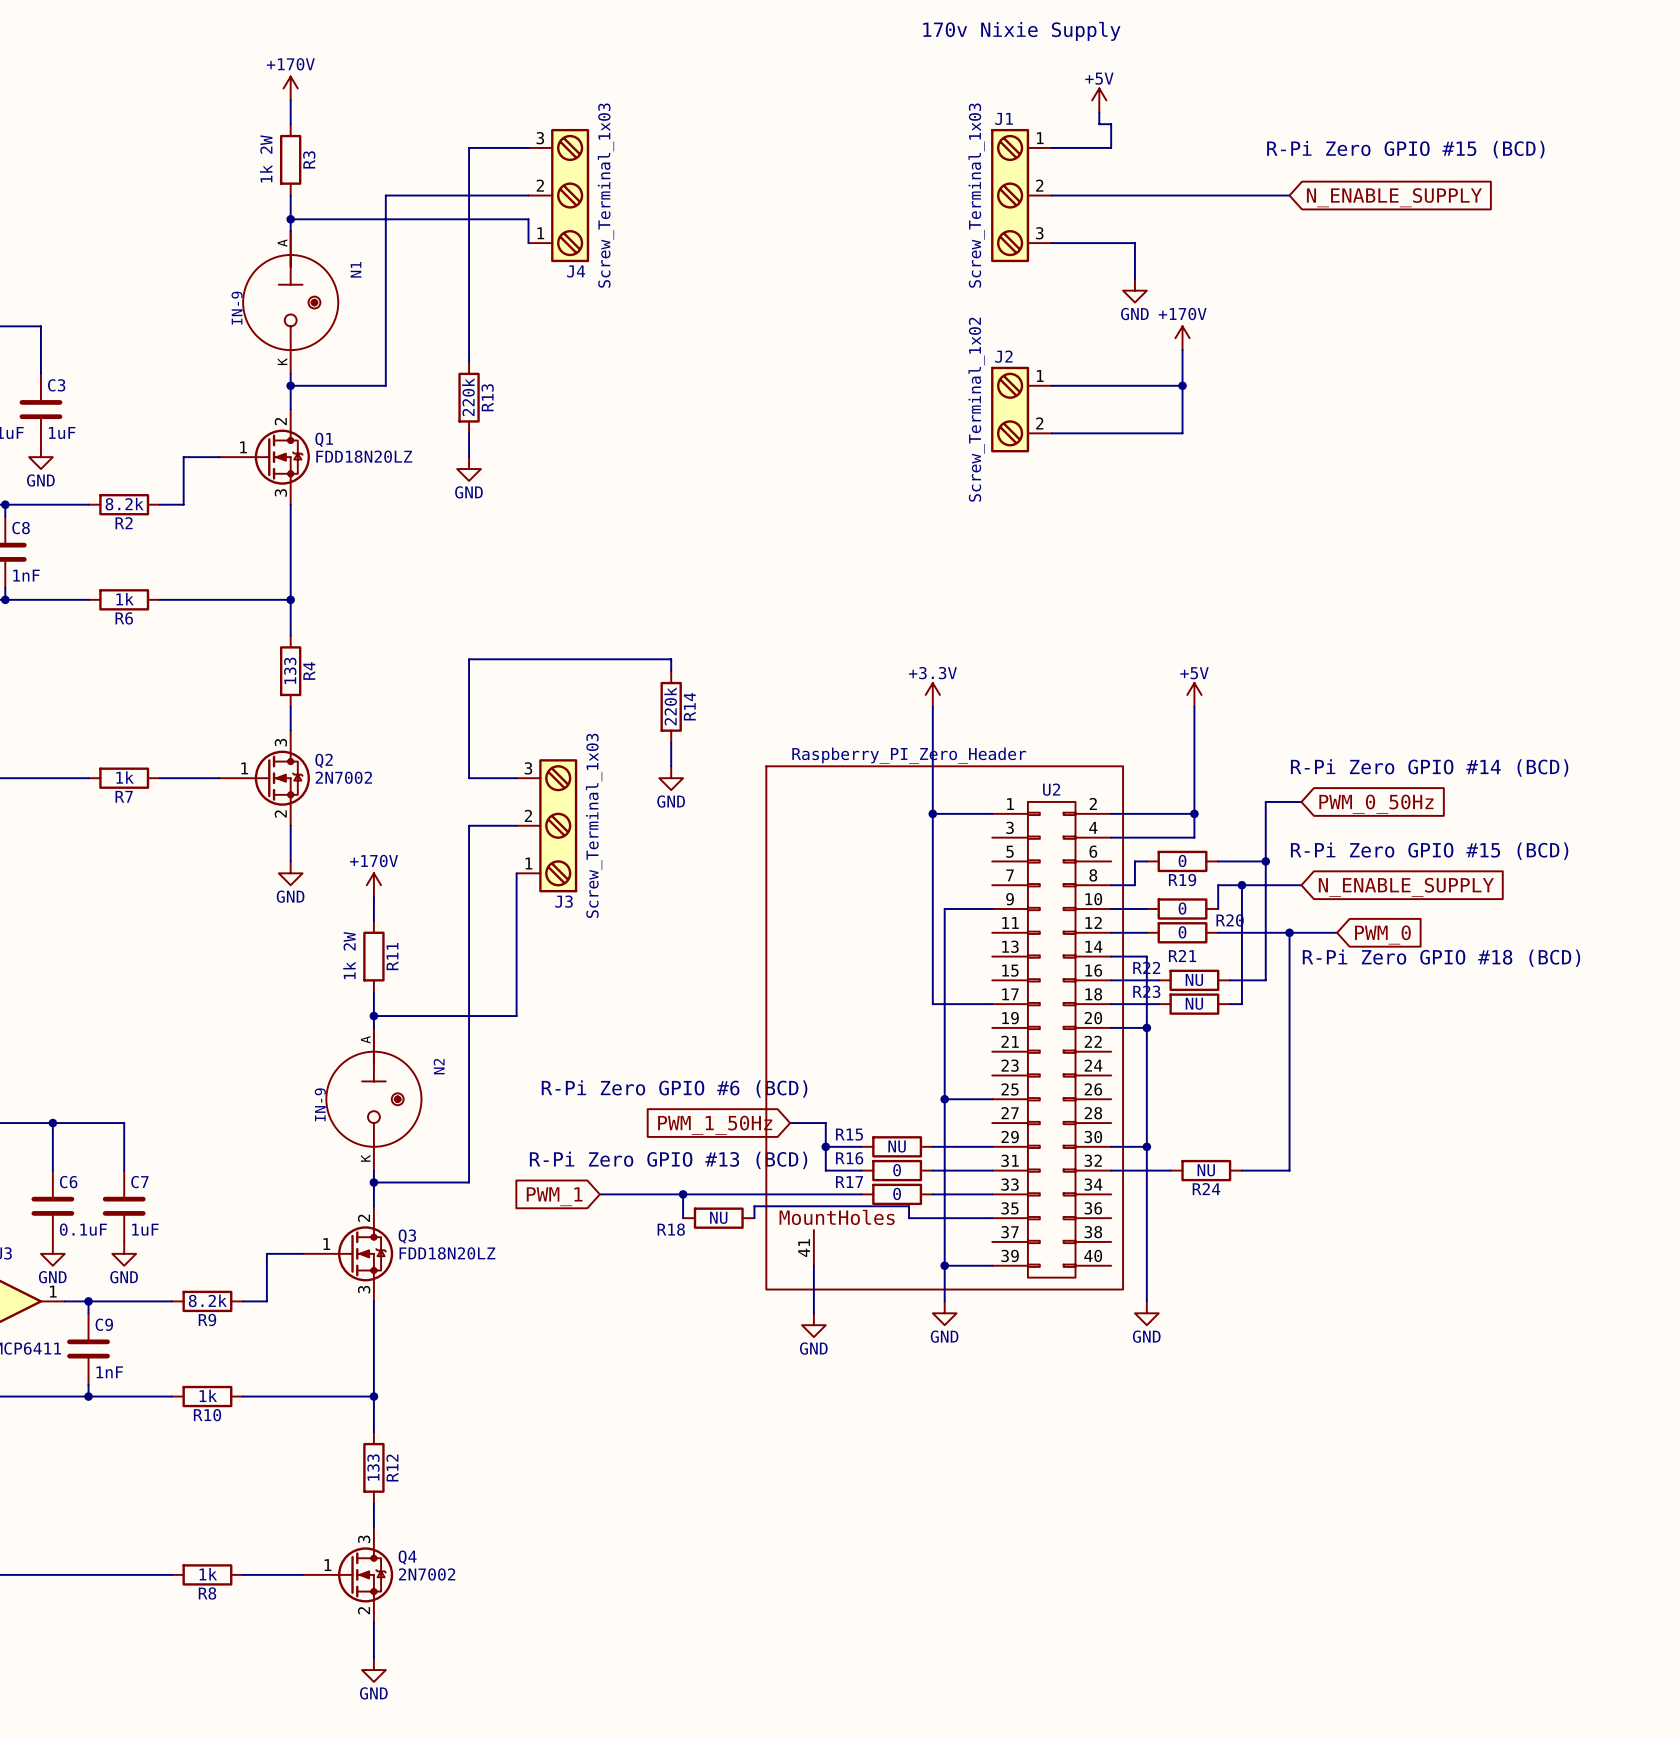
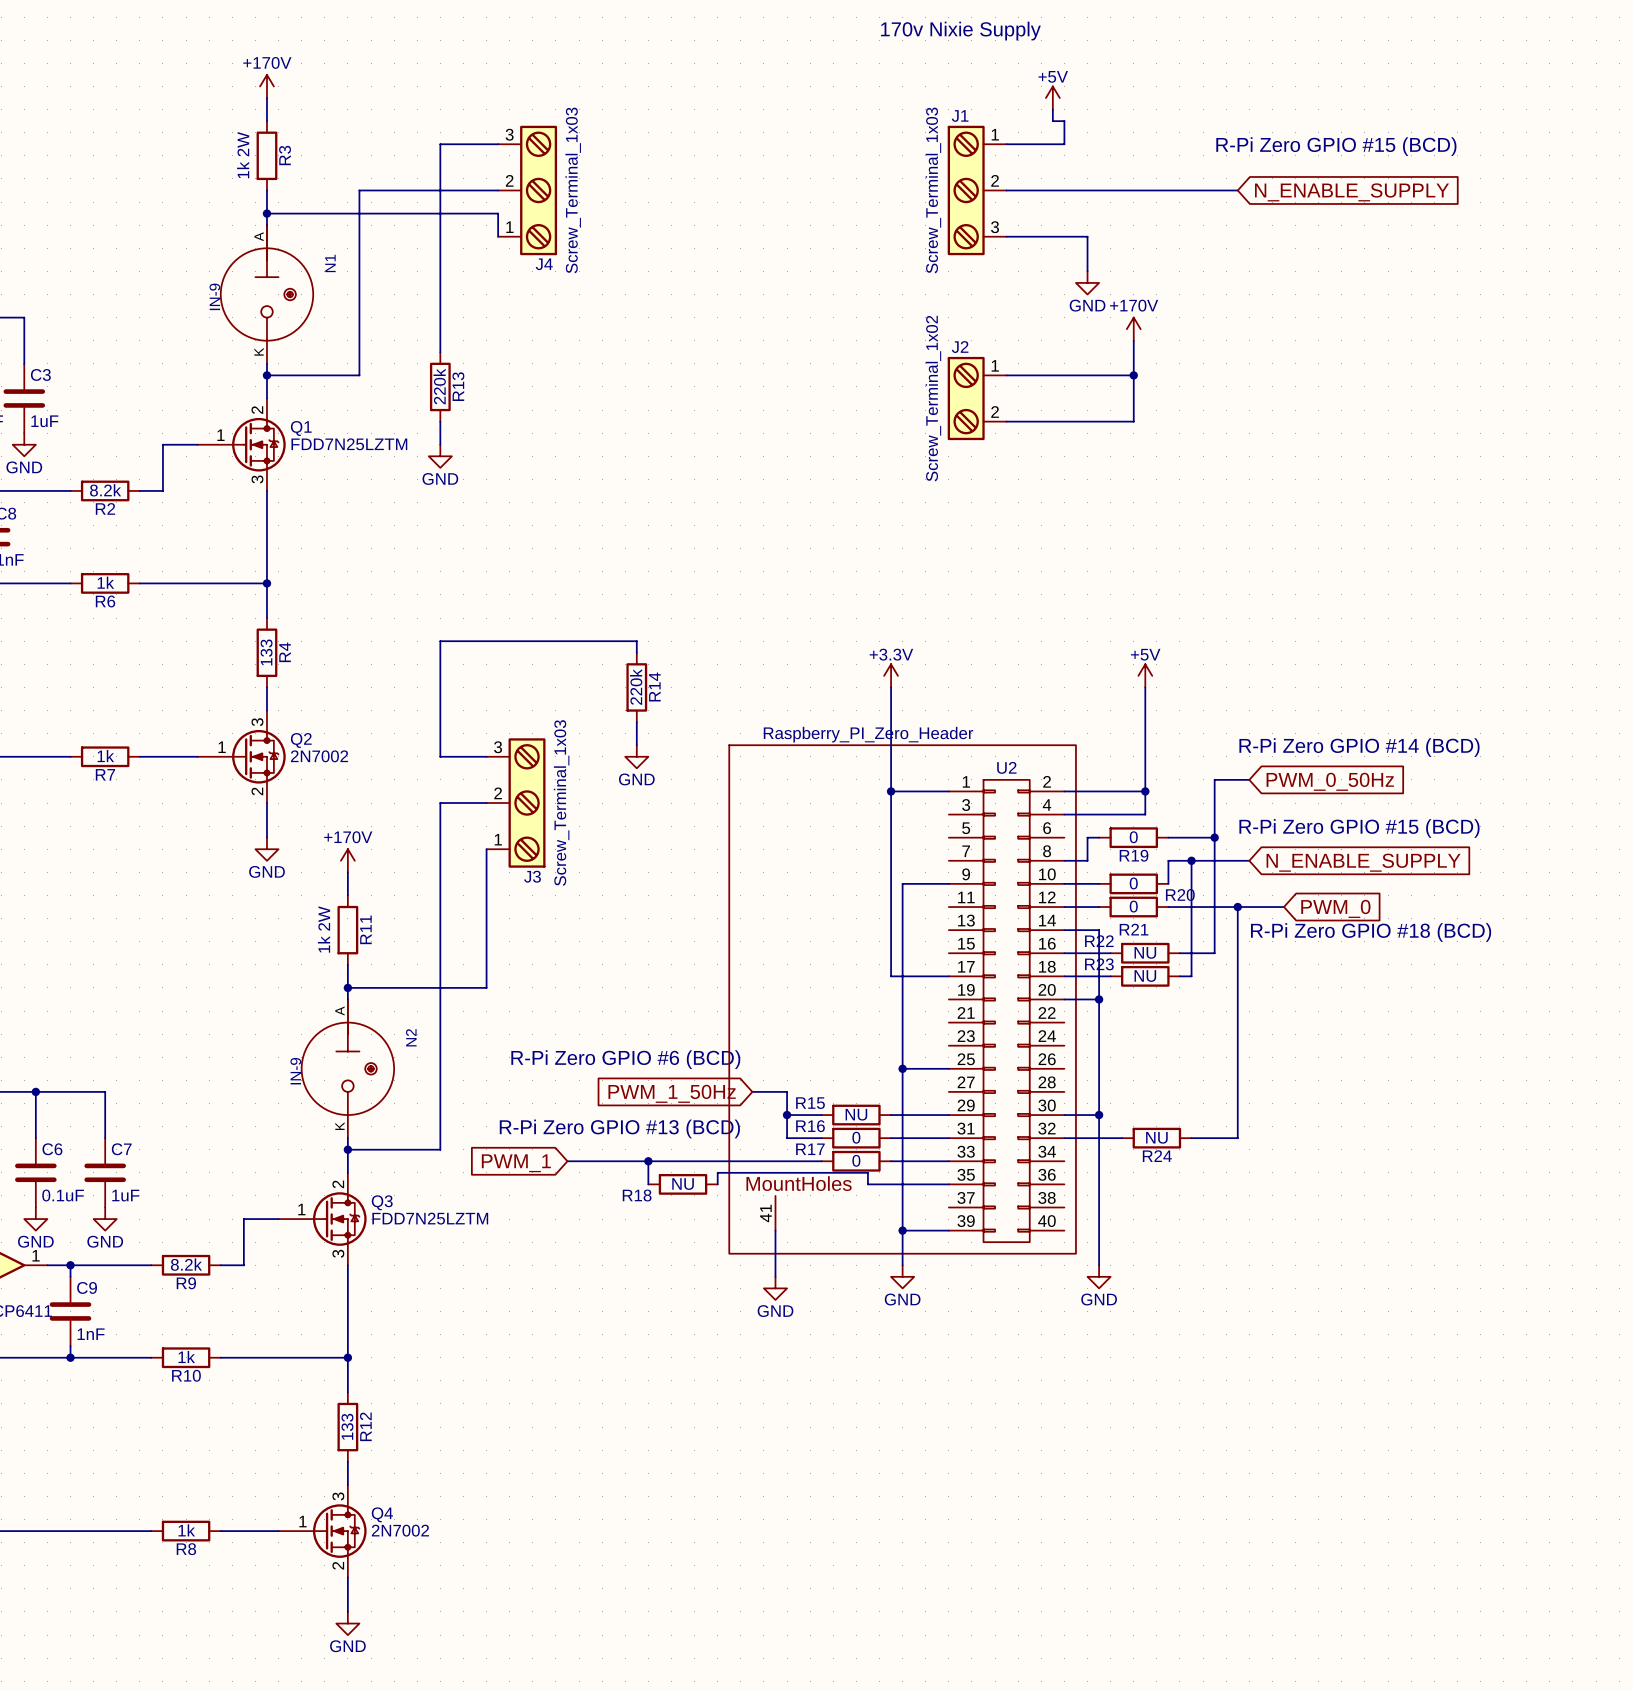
Q1 value: FDD18N20LZ (364, 456) -> FDD7N25LZTM (349, 444)
Q3 value: FDD18N20LZ (447, 1253) -> FDD7N25LZTM (430, 1218)

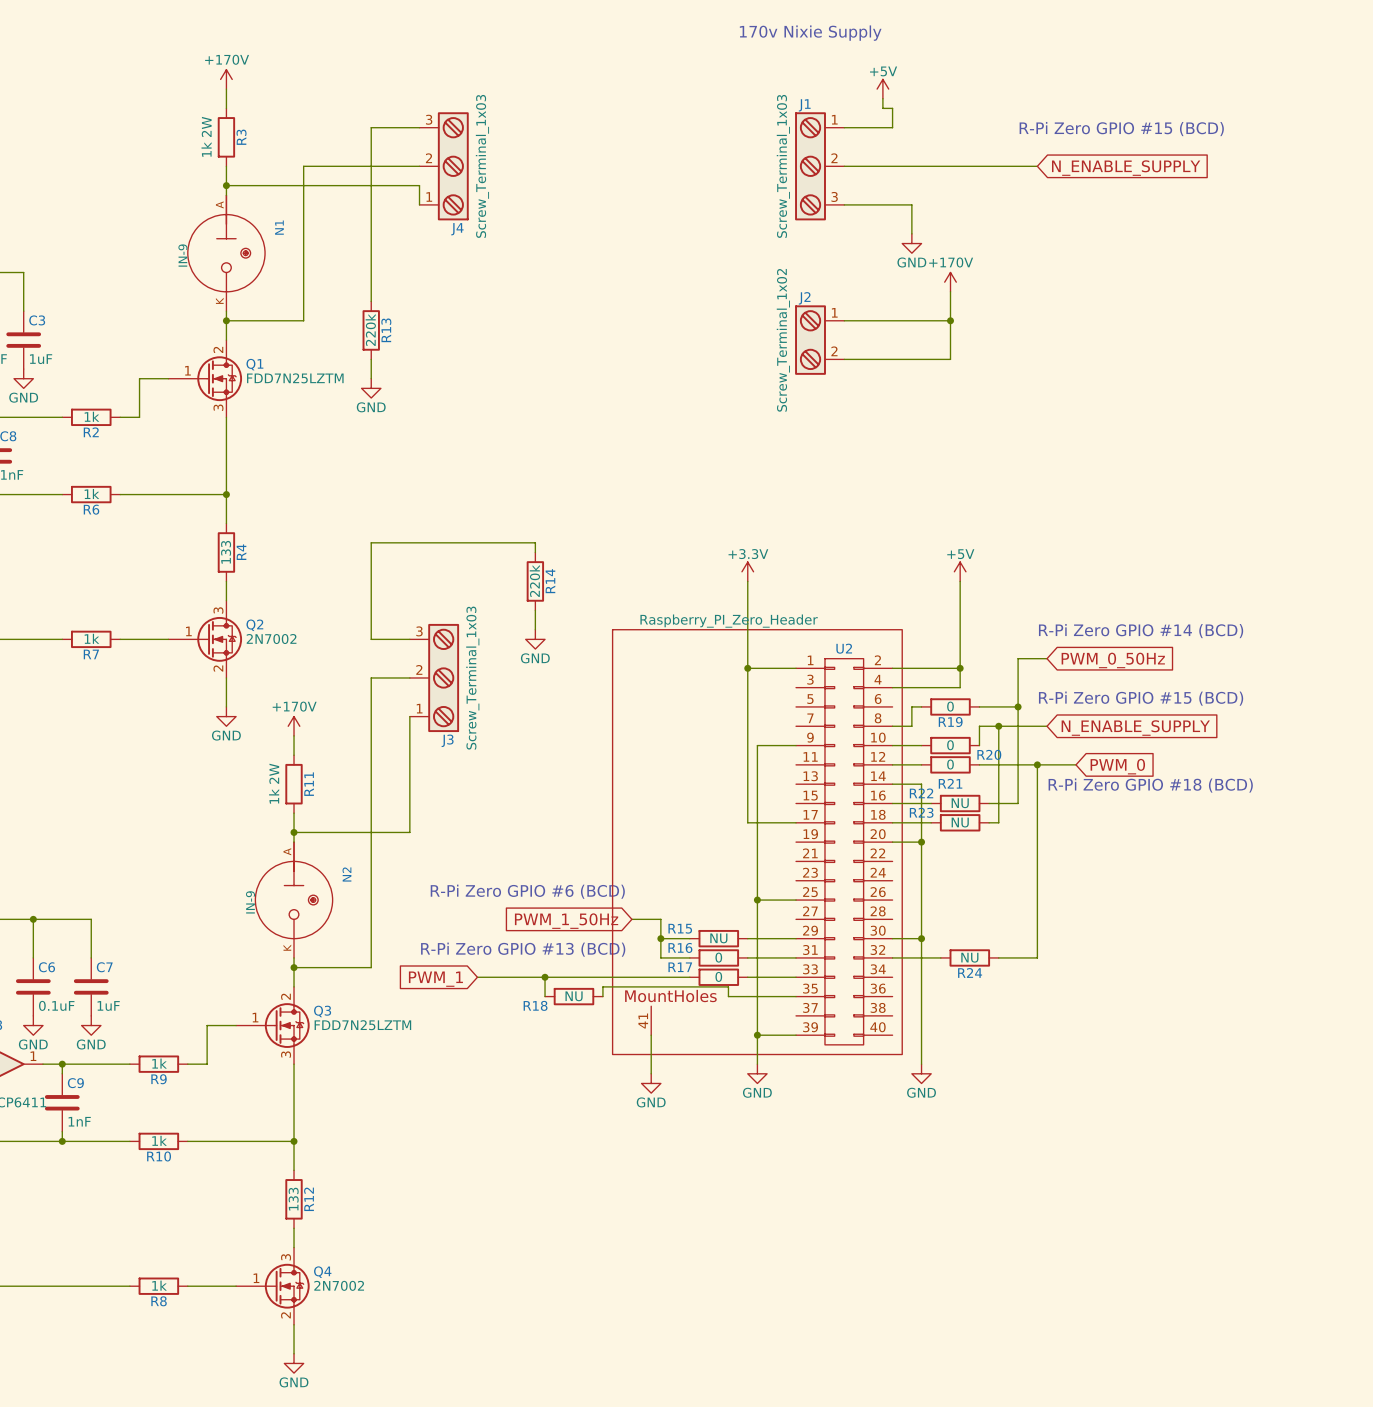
R2 value: 8.2k (105, 490) -> 1k (91, 416)
R9 value: 8.2k (186, 1264) -> 1k (159, 1063)

